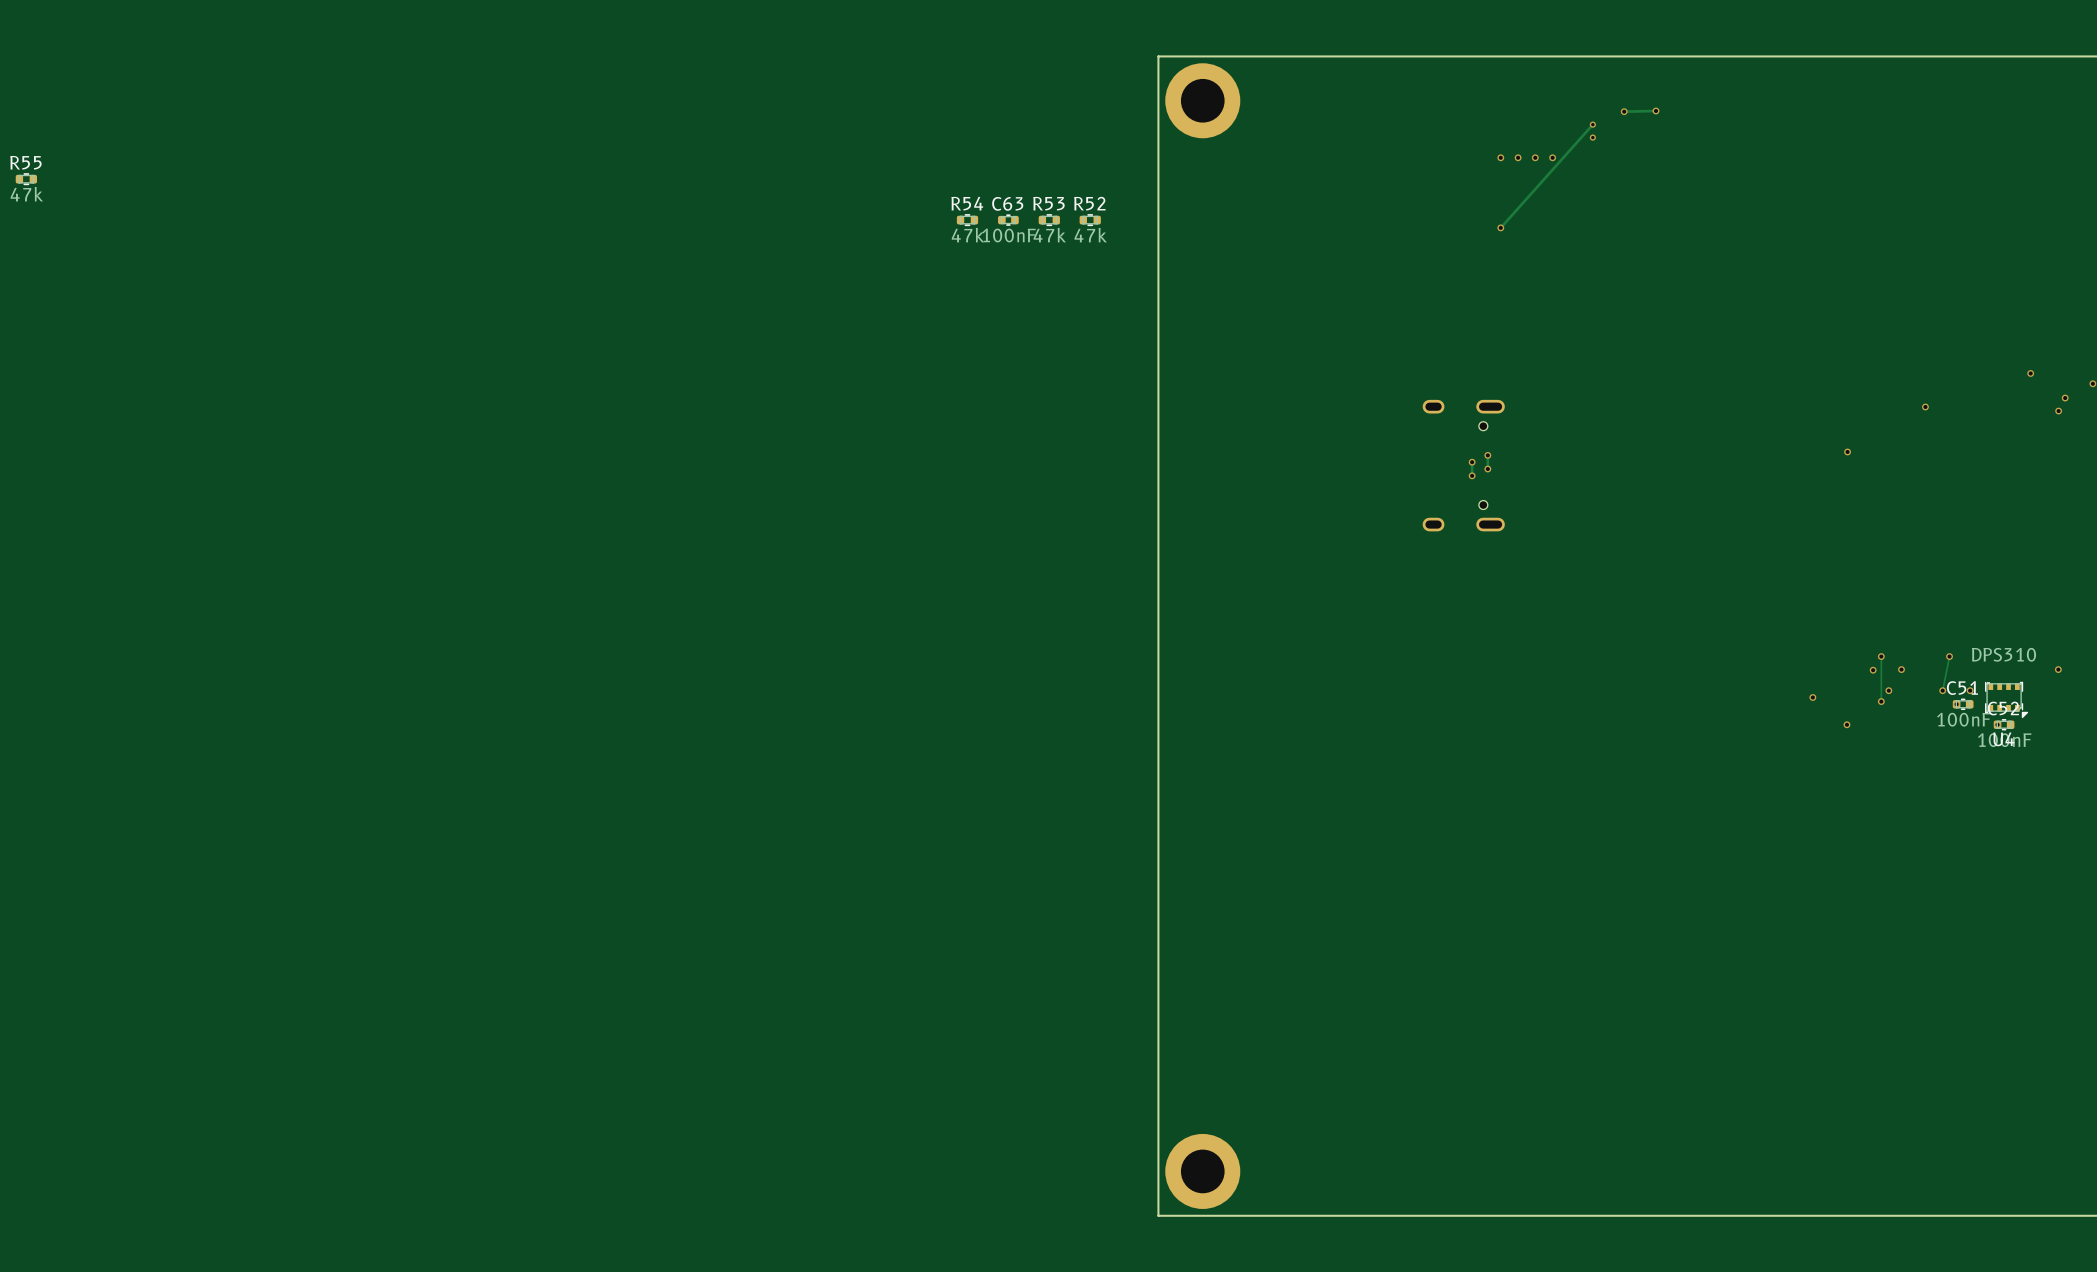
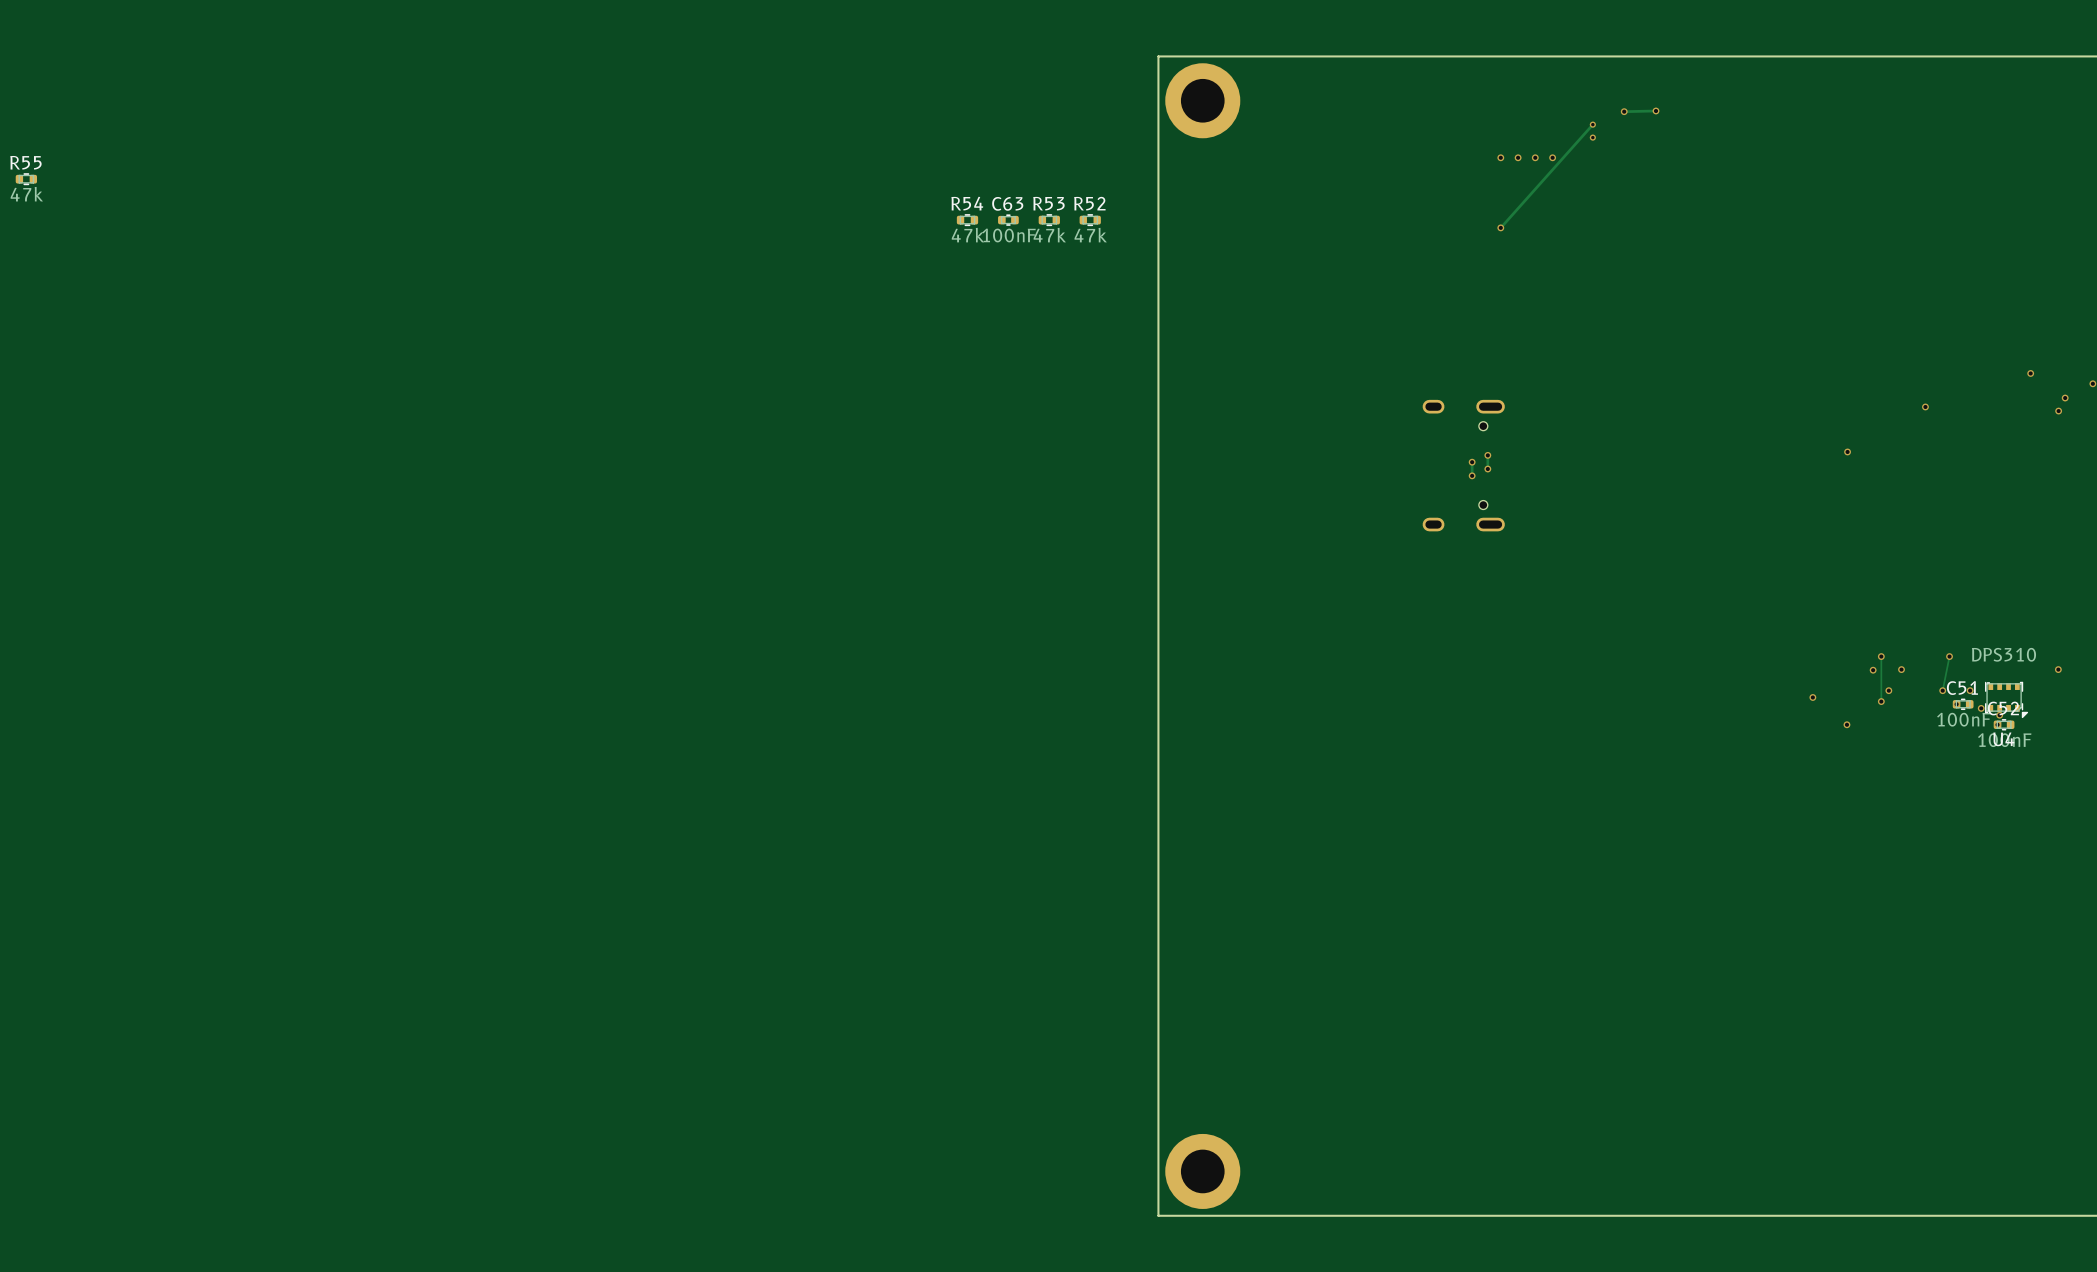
via: none -> (1981, 708)
via: none -> (1999, 715)

